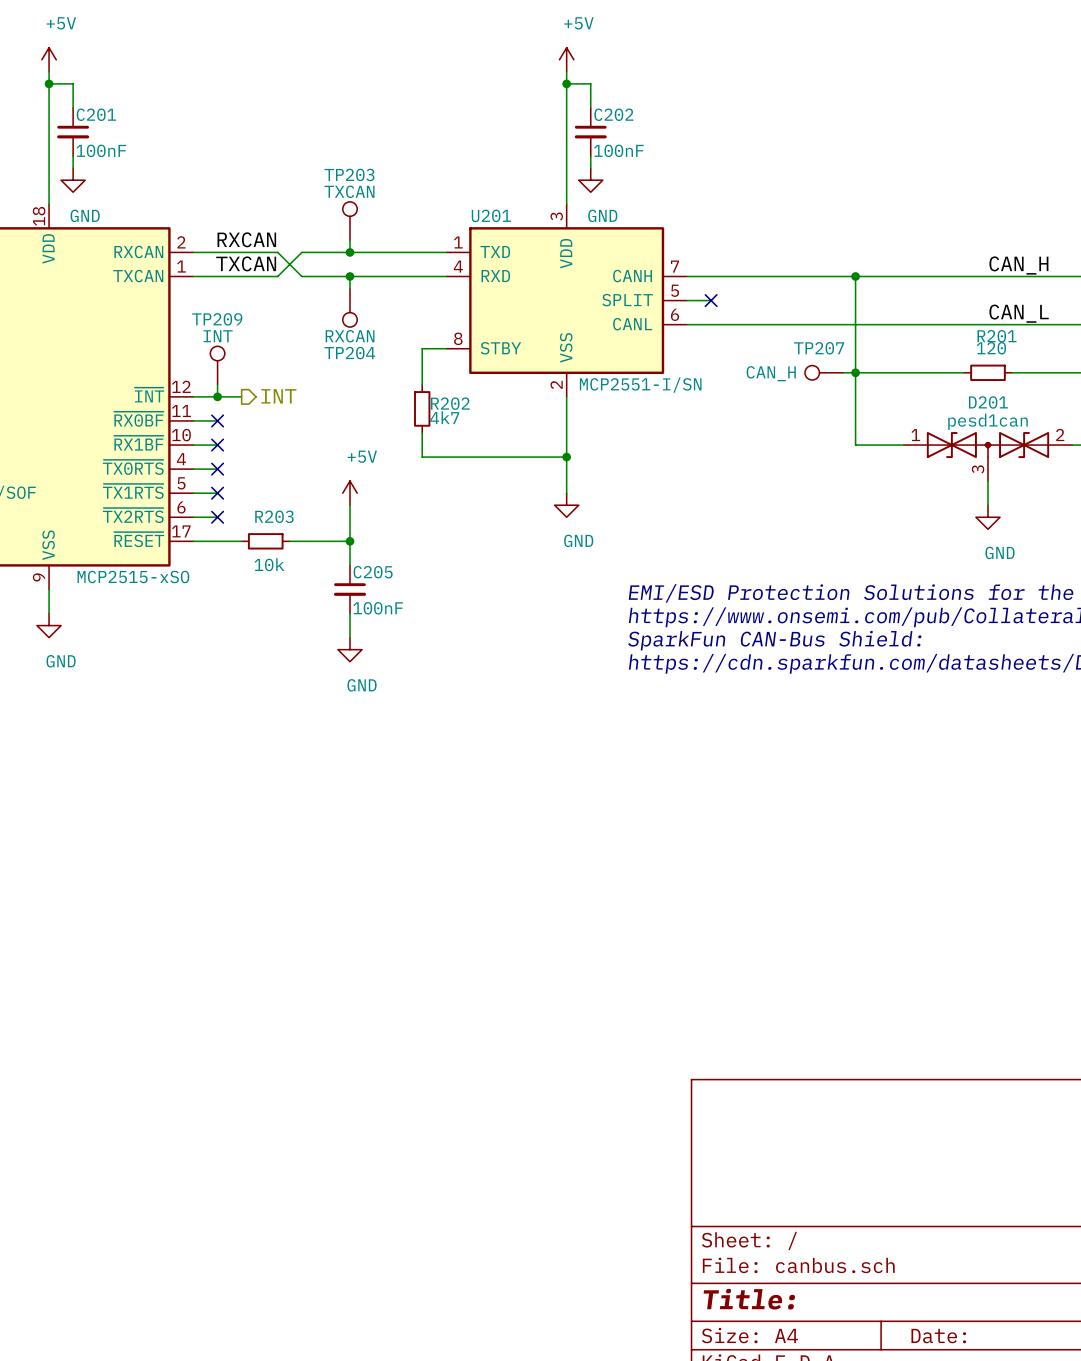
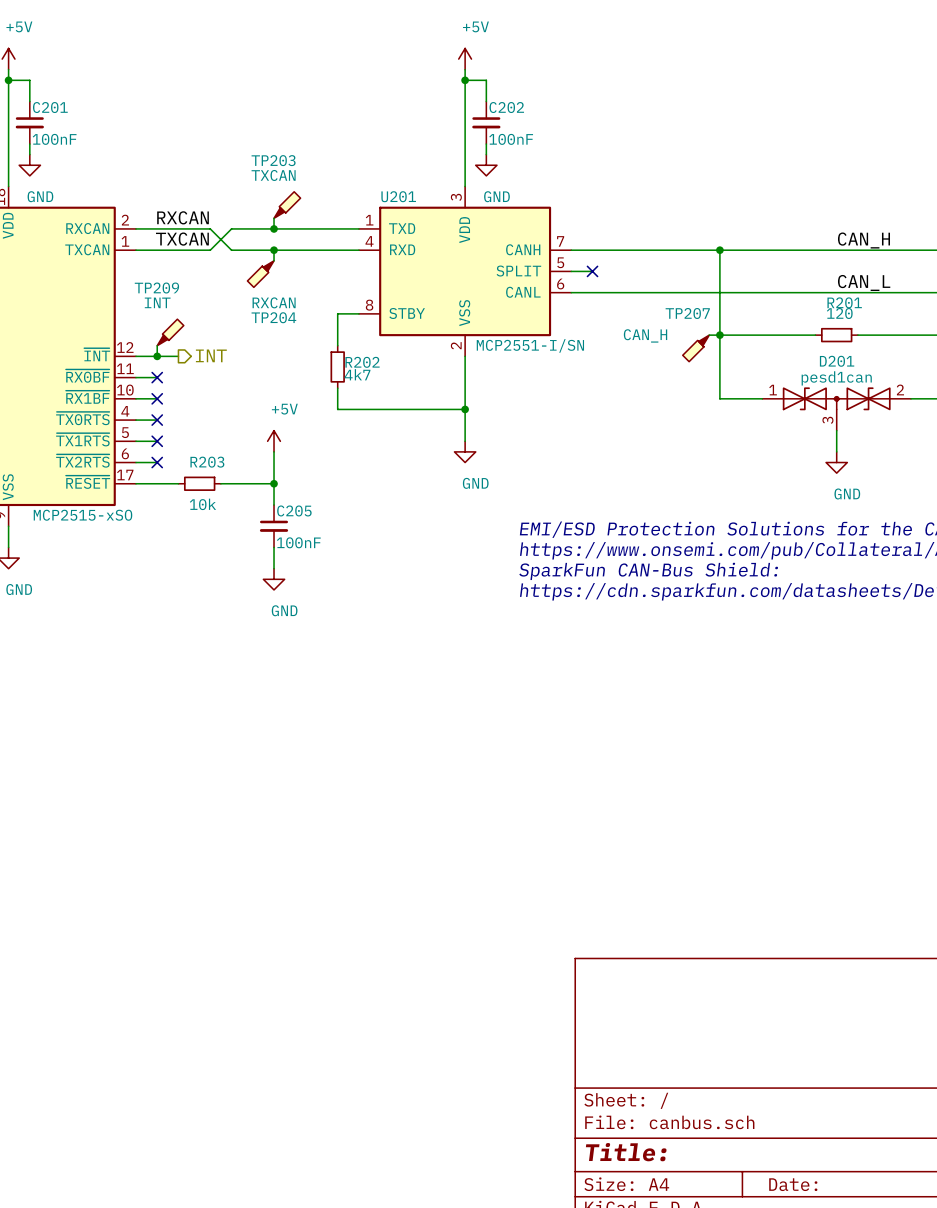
TP203 symbol: [342, 201, 358, 241] -> [274, 191, 301, 219]
TP204 symbol: [342, 288, 358, 328] -> [247, 260, 275, 288]
TP209 symbol: [210, 346, 225, 385] -> [157, 319, 184, 346]
TP207 symbol: [805, 365, 844, 381] -> [682, 335, 710, 362]

